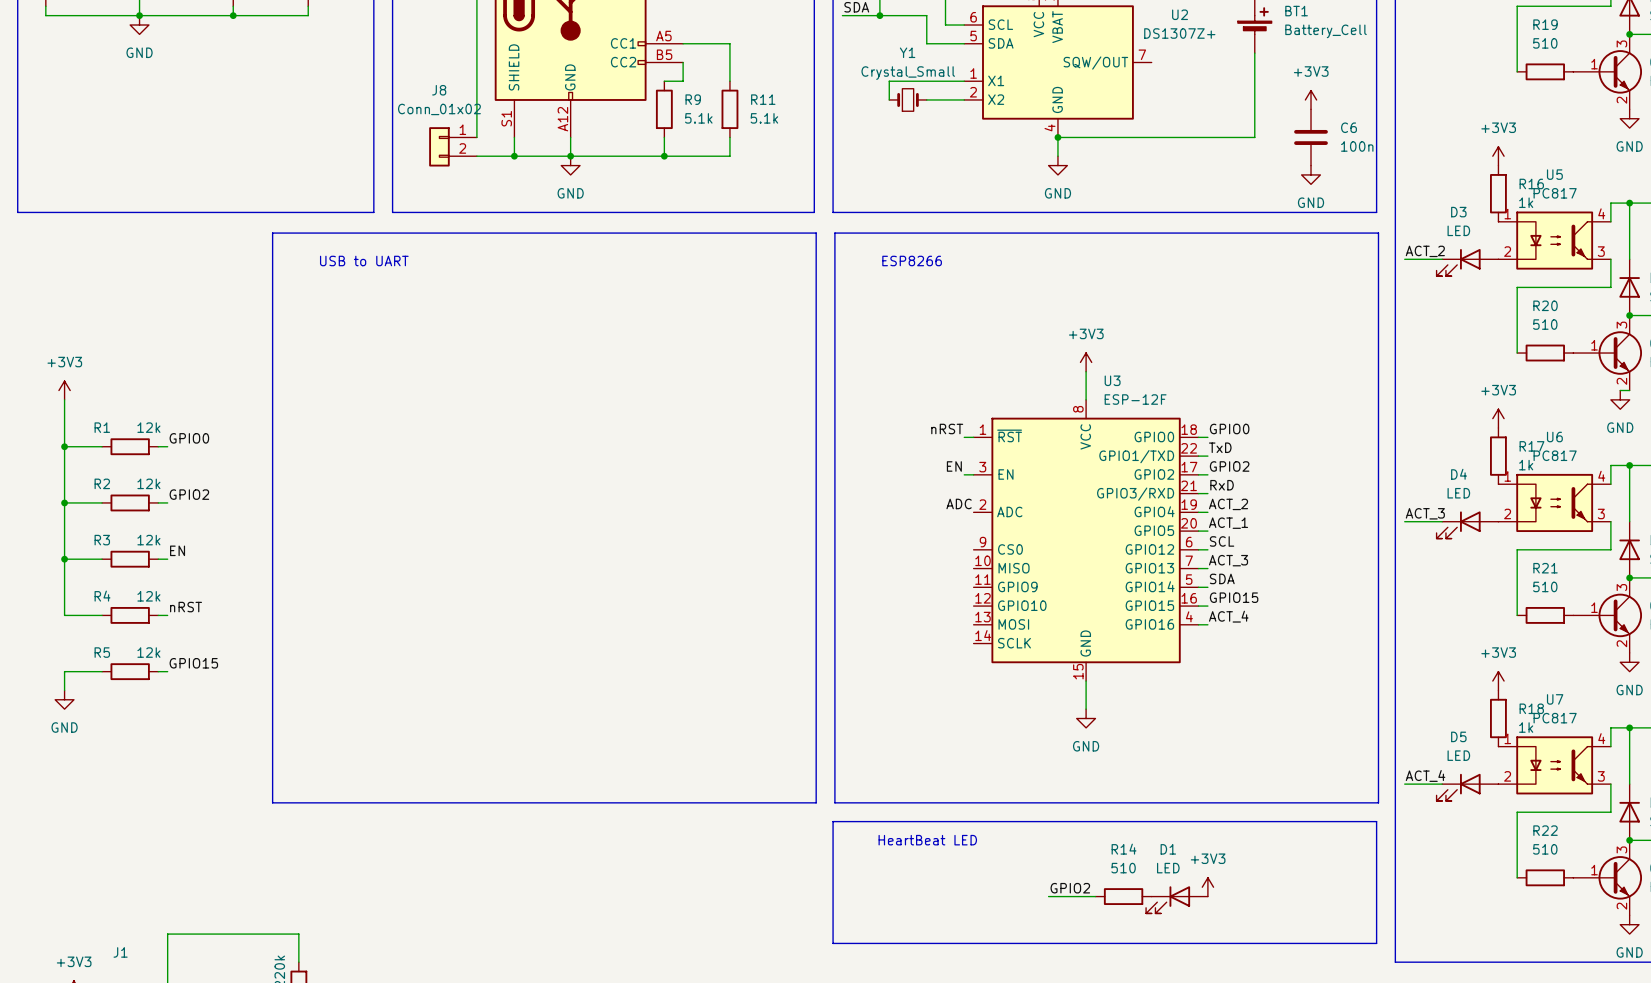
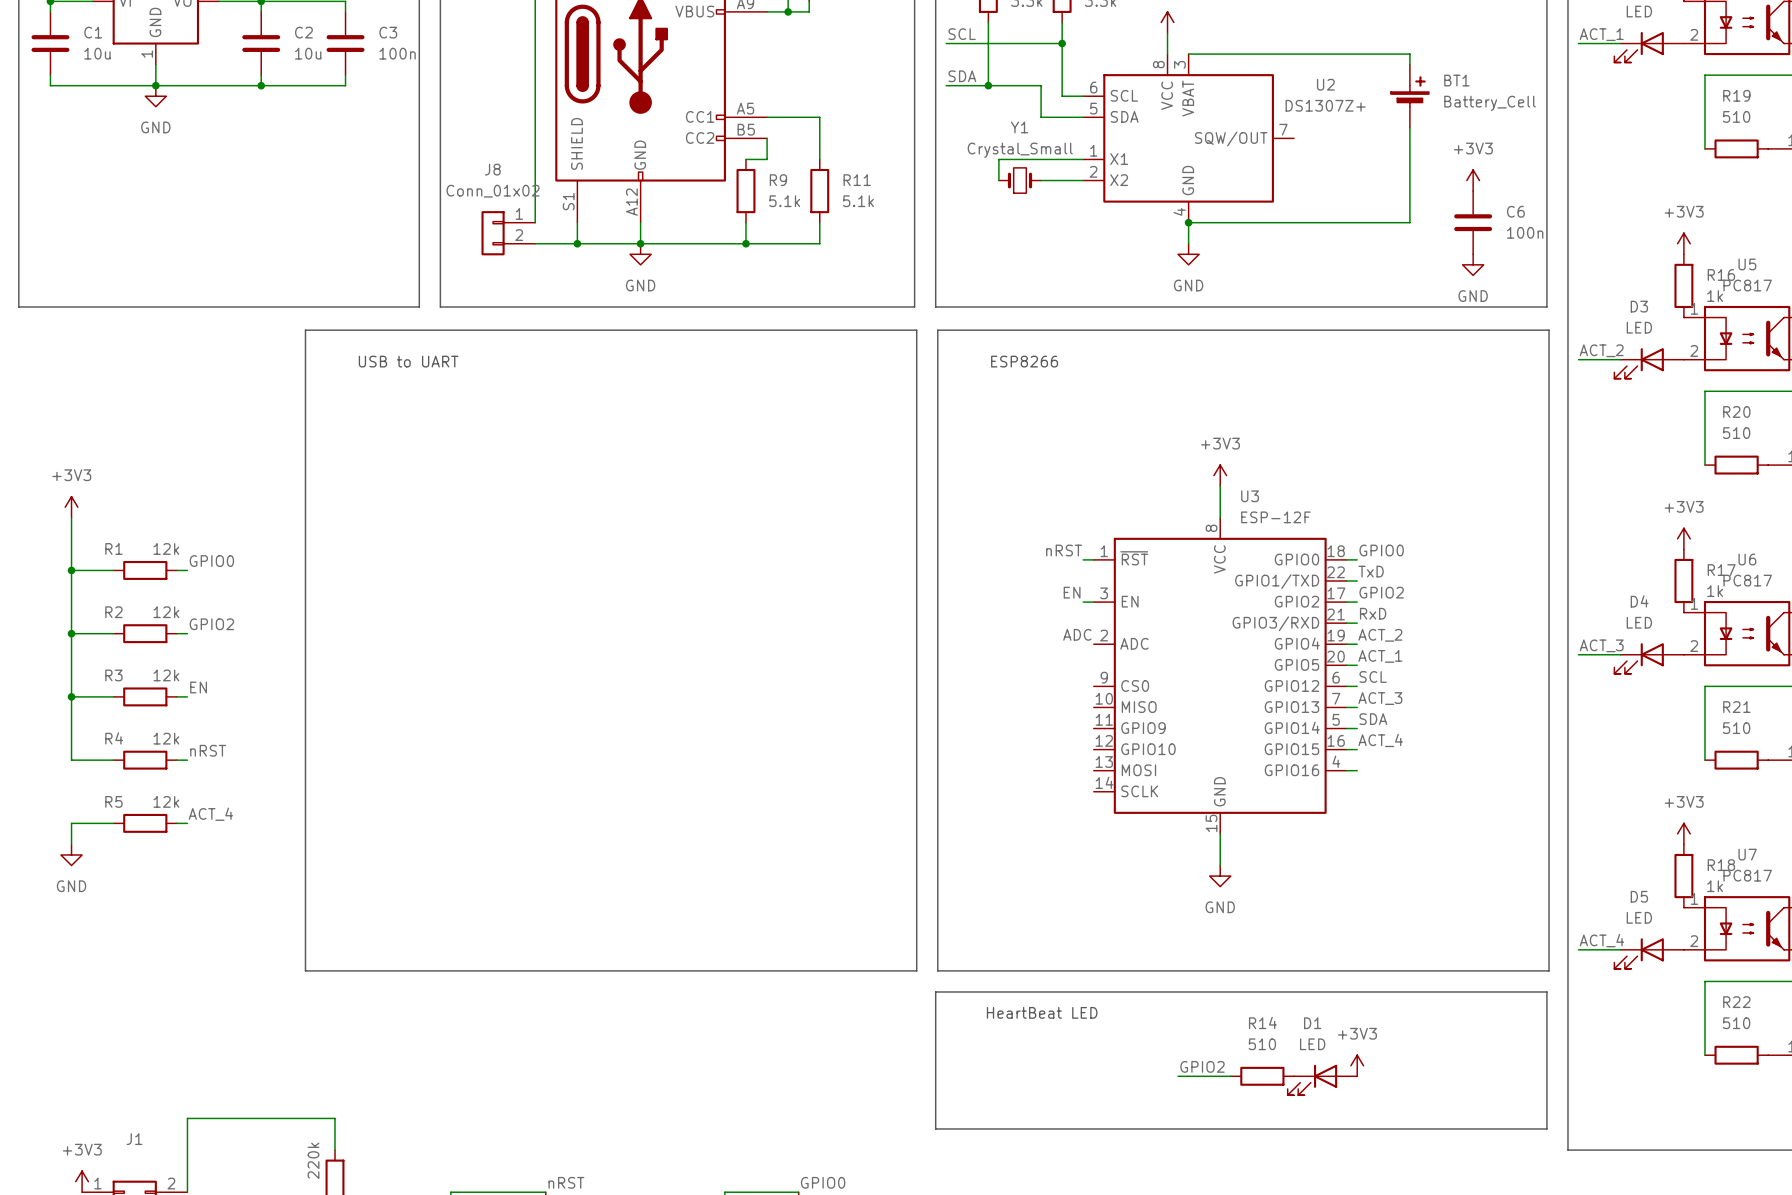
label: GPIO15 (1234, 597) -> ACT_4 (1380, 740)
label: ACT_4 (1228, 616) -> none
label: GPIO15 (193, 663) -> ACT_4 (210, 814)

